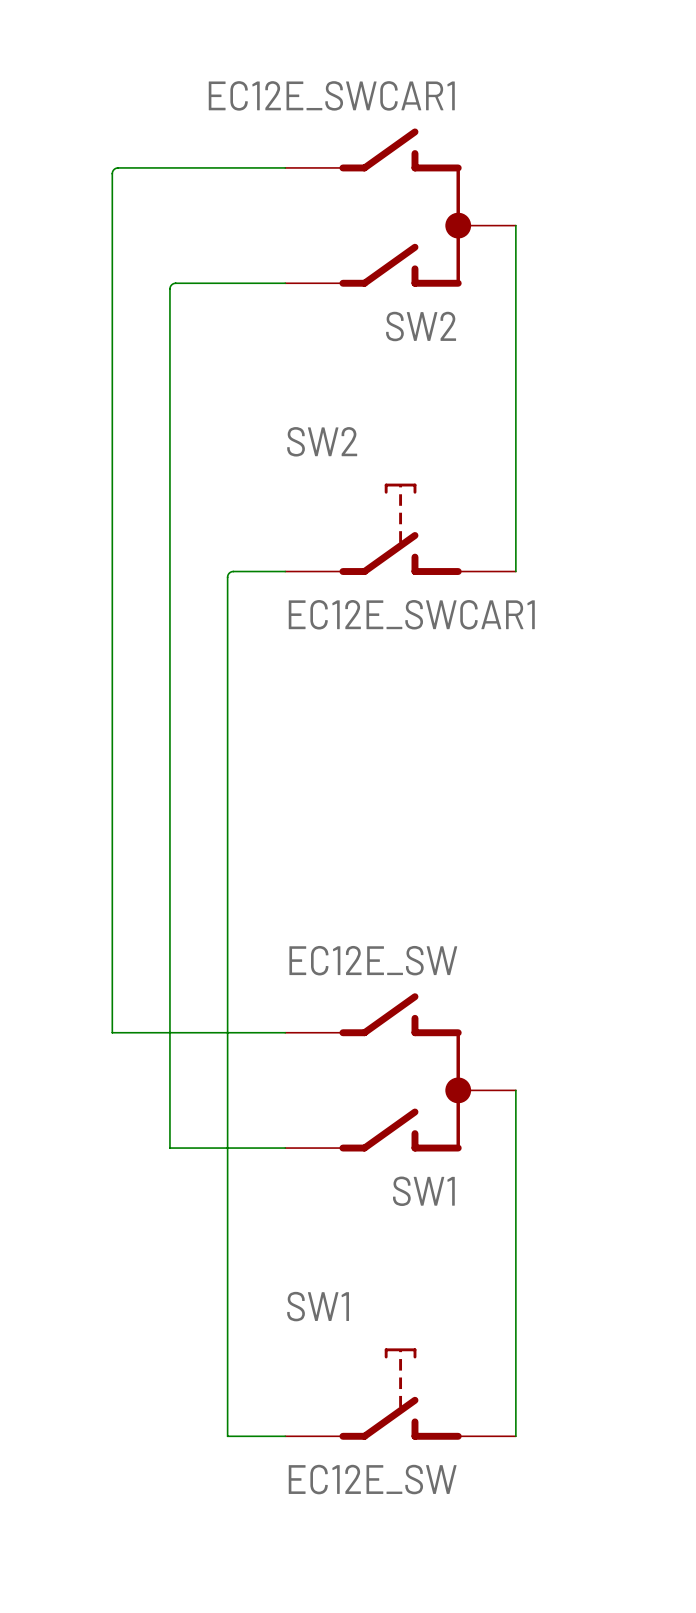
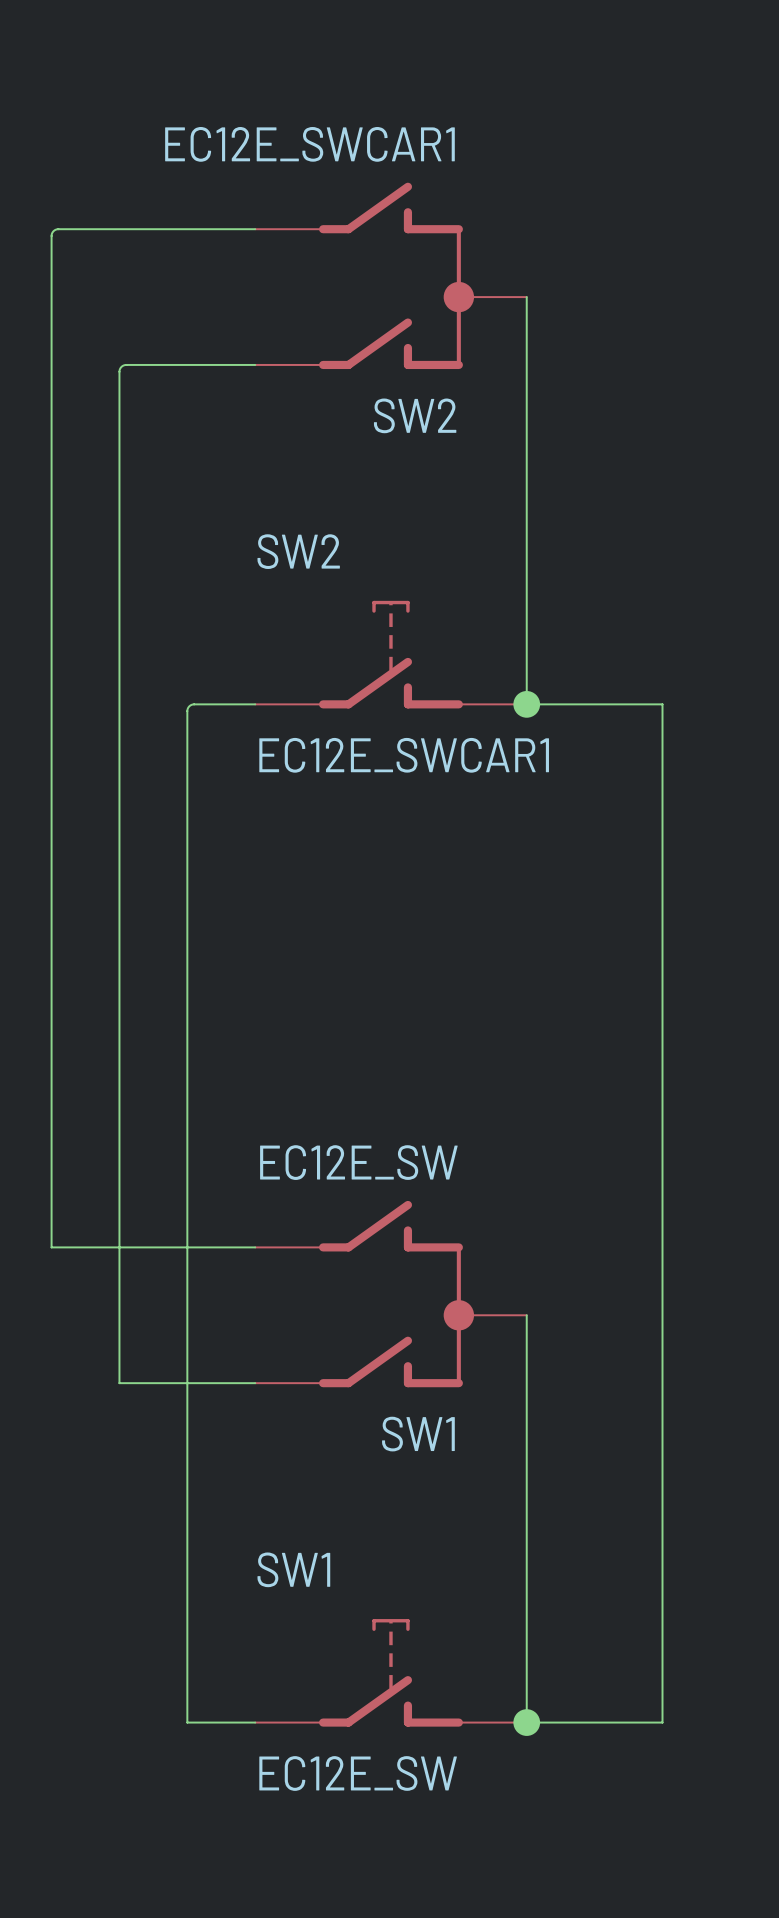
wire: none -> (526, 704) (662, 704) (662, 1722) (526, 1722)
junction: none -> (526, 704)
junction: none -> (526, 1722)

